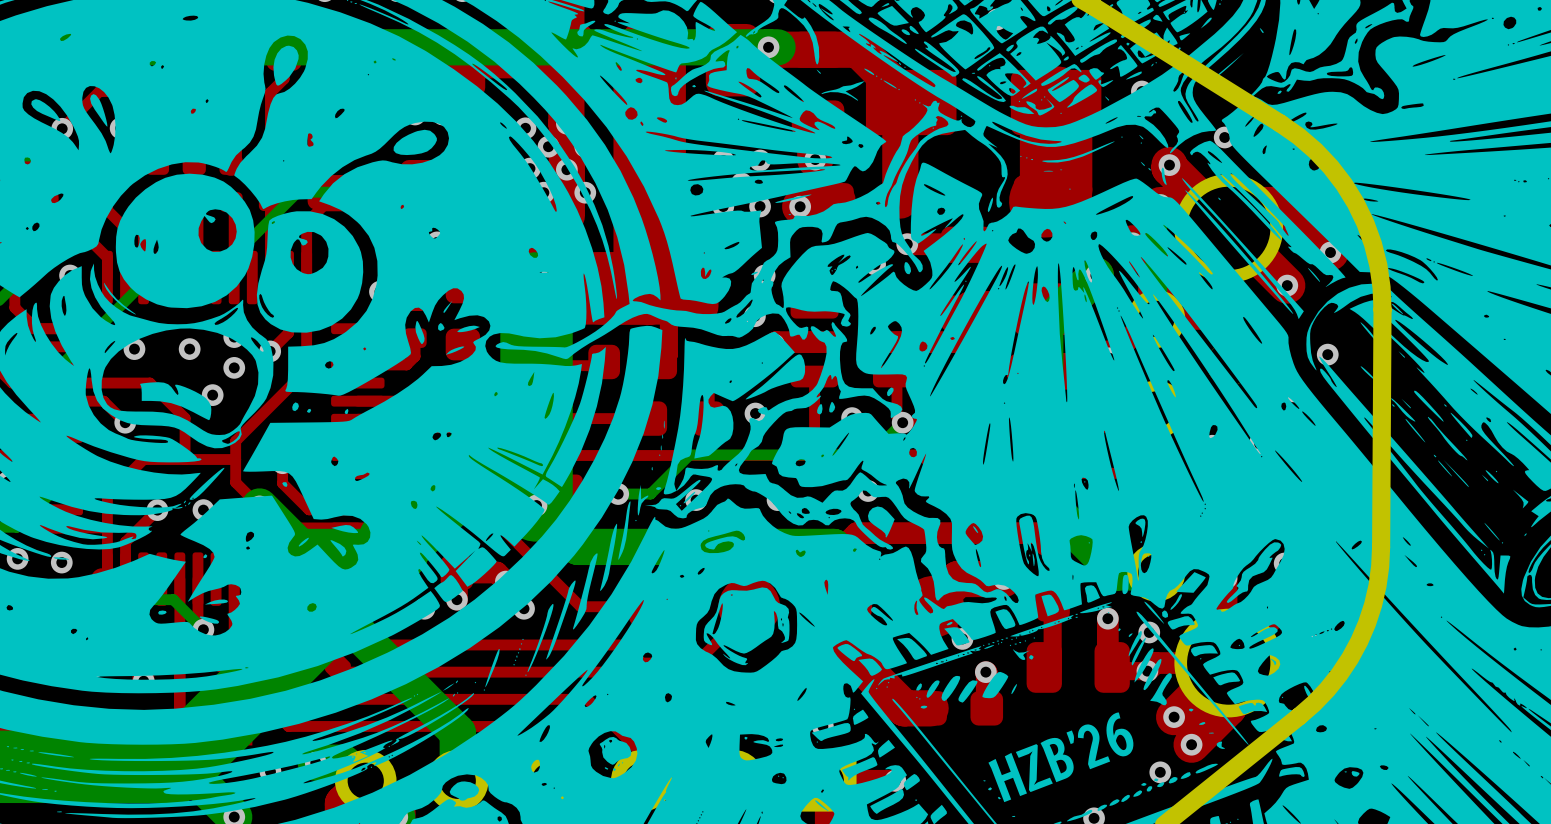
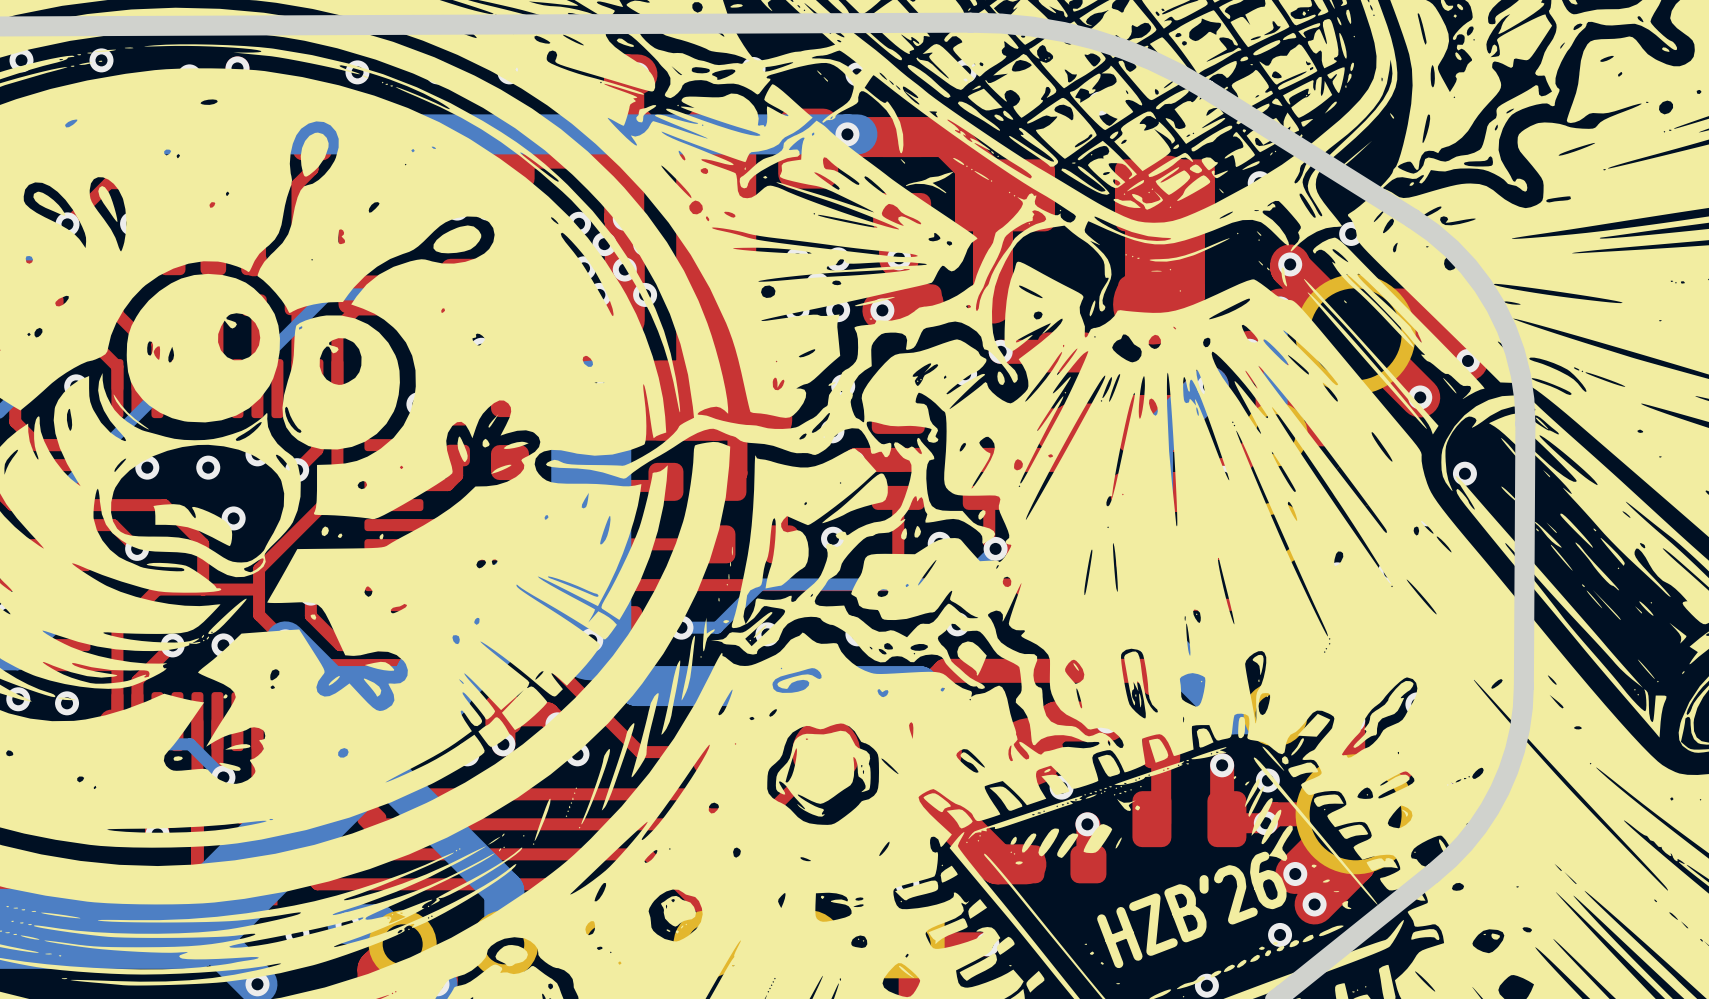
via: (234, 367) -> none

